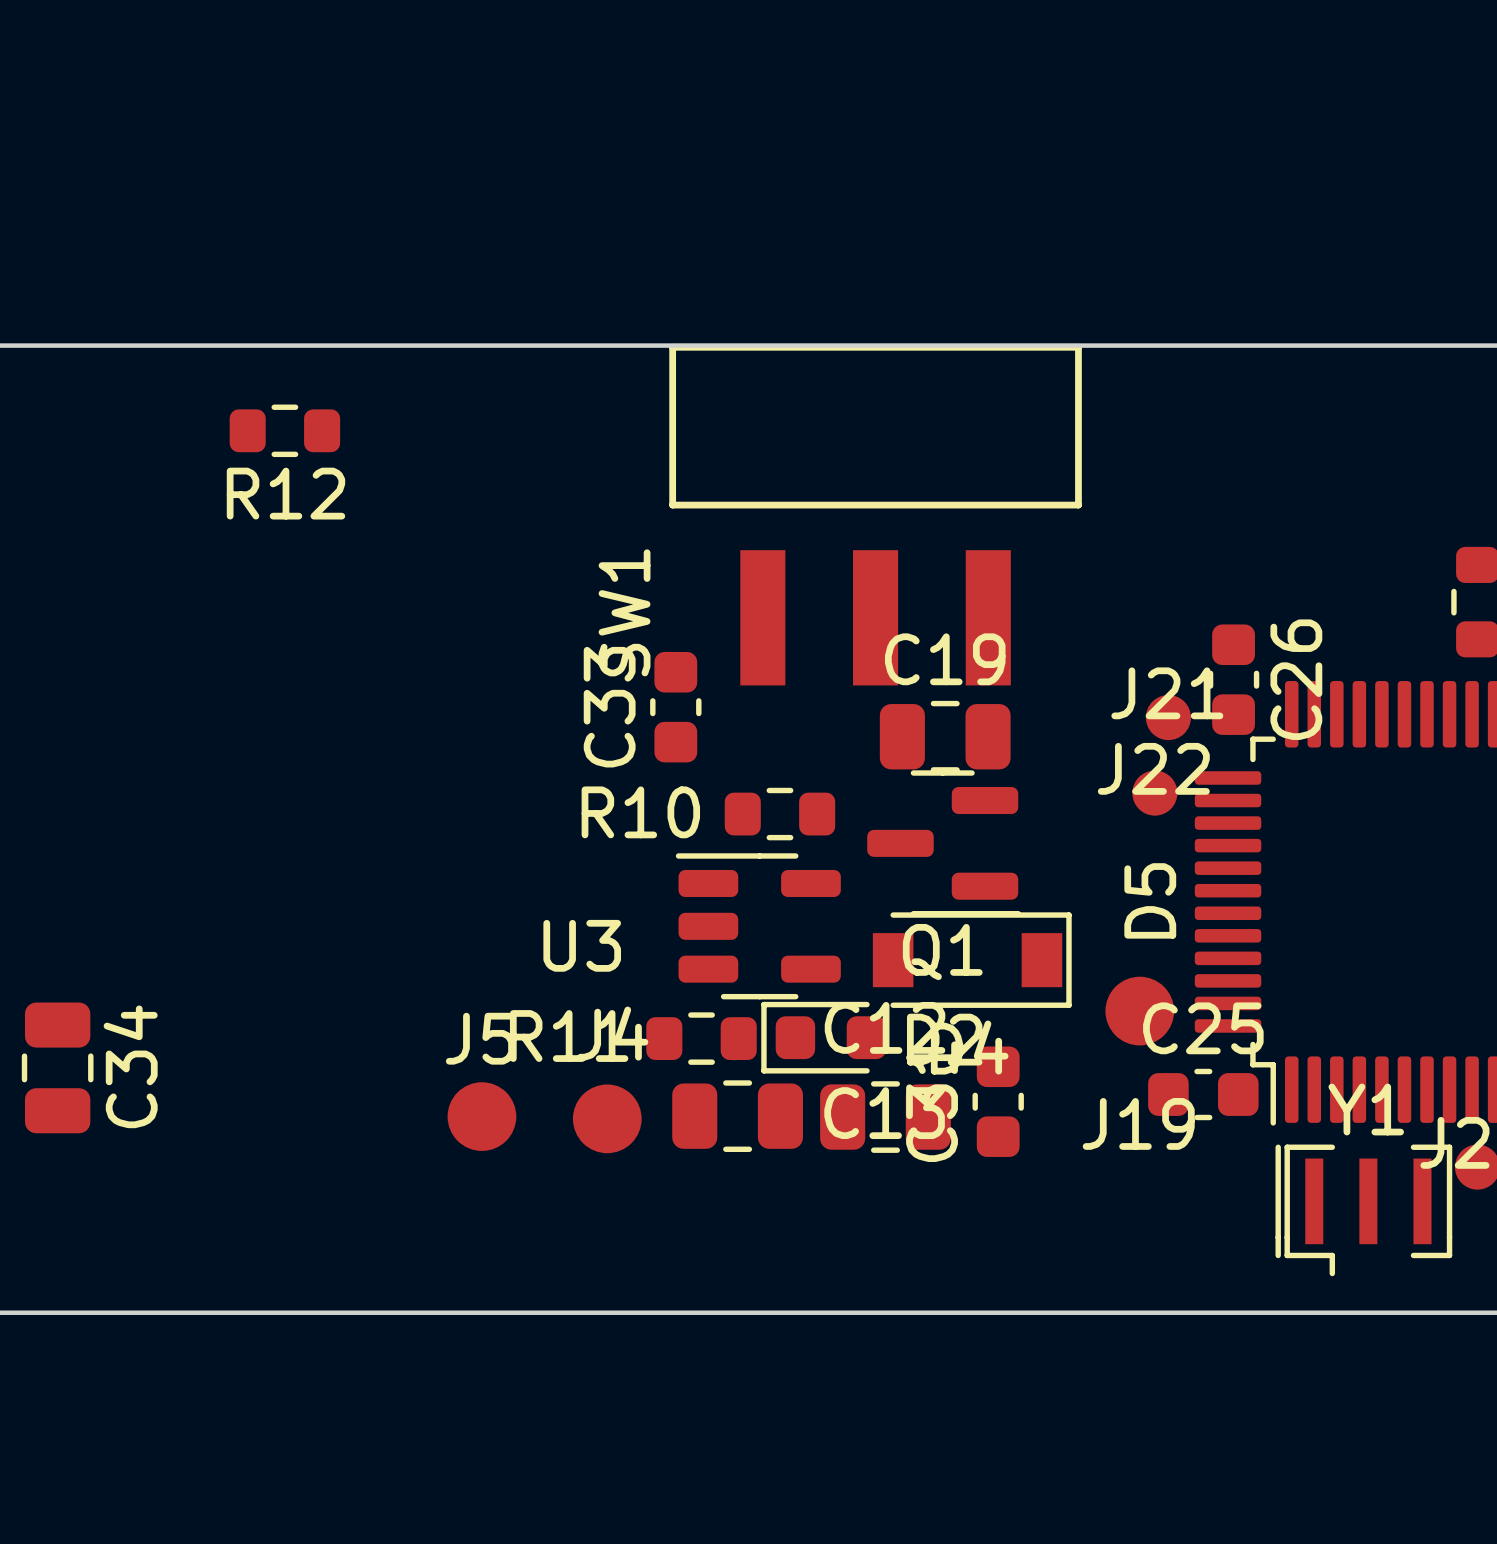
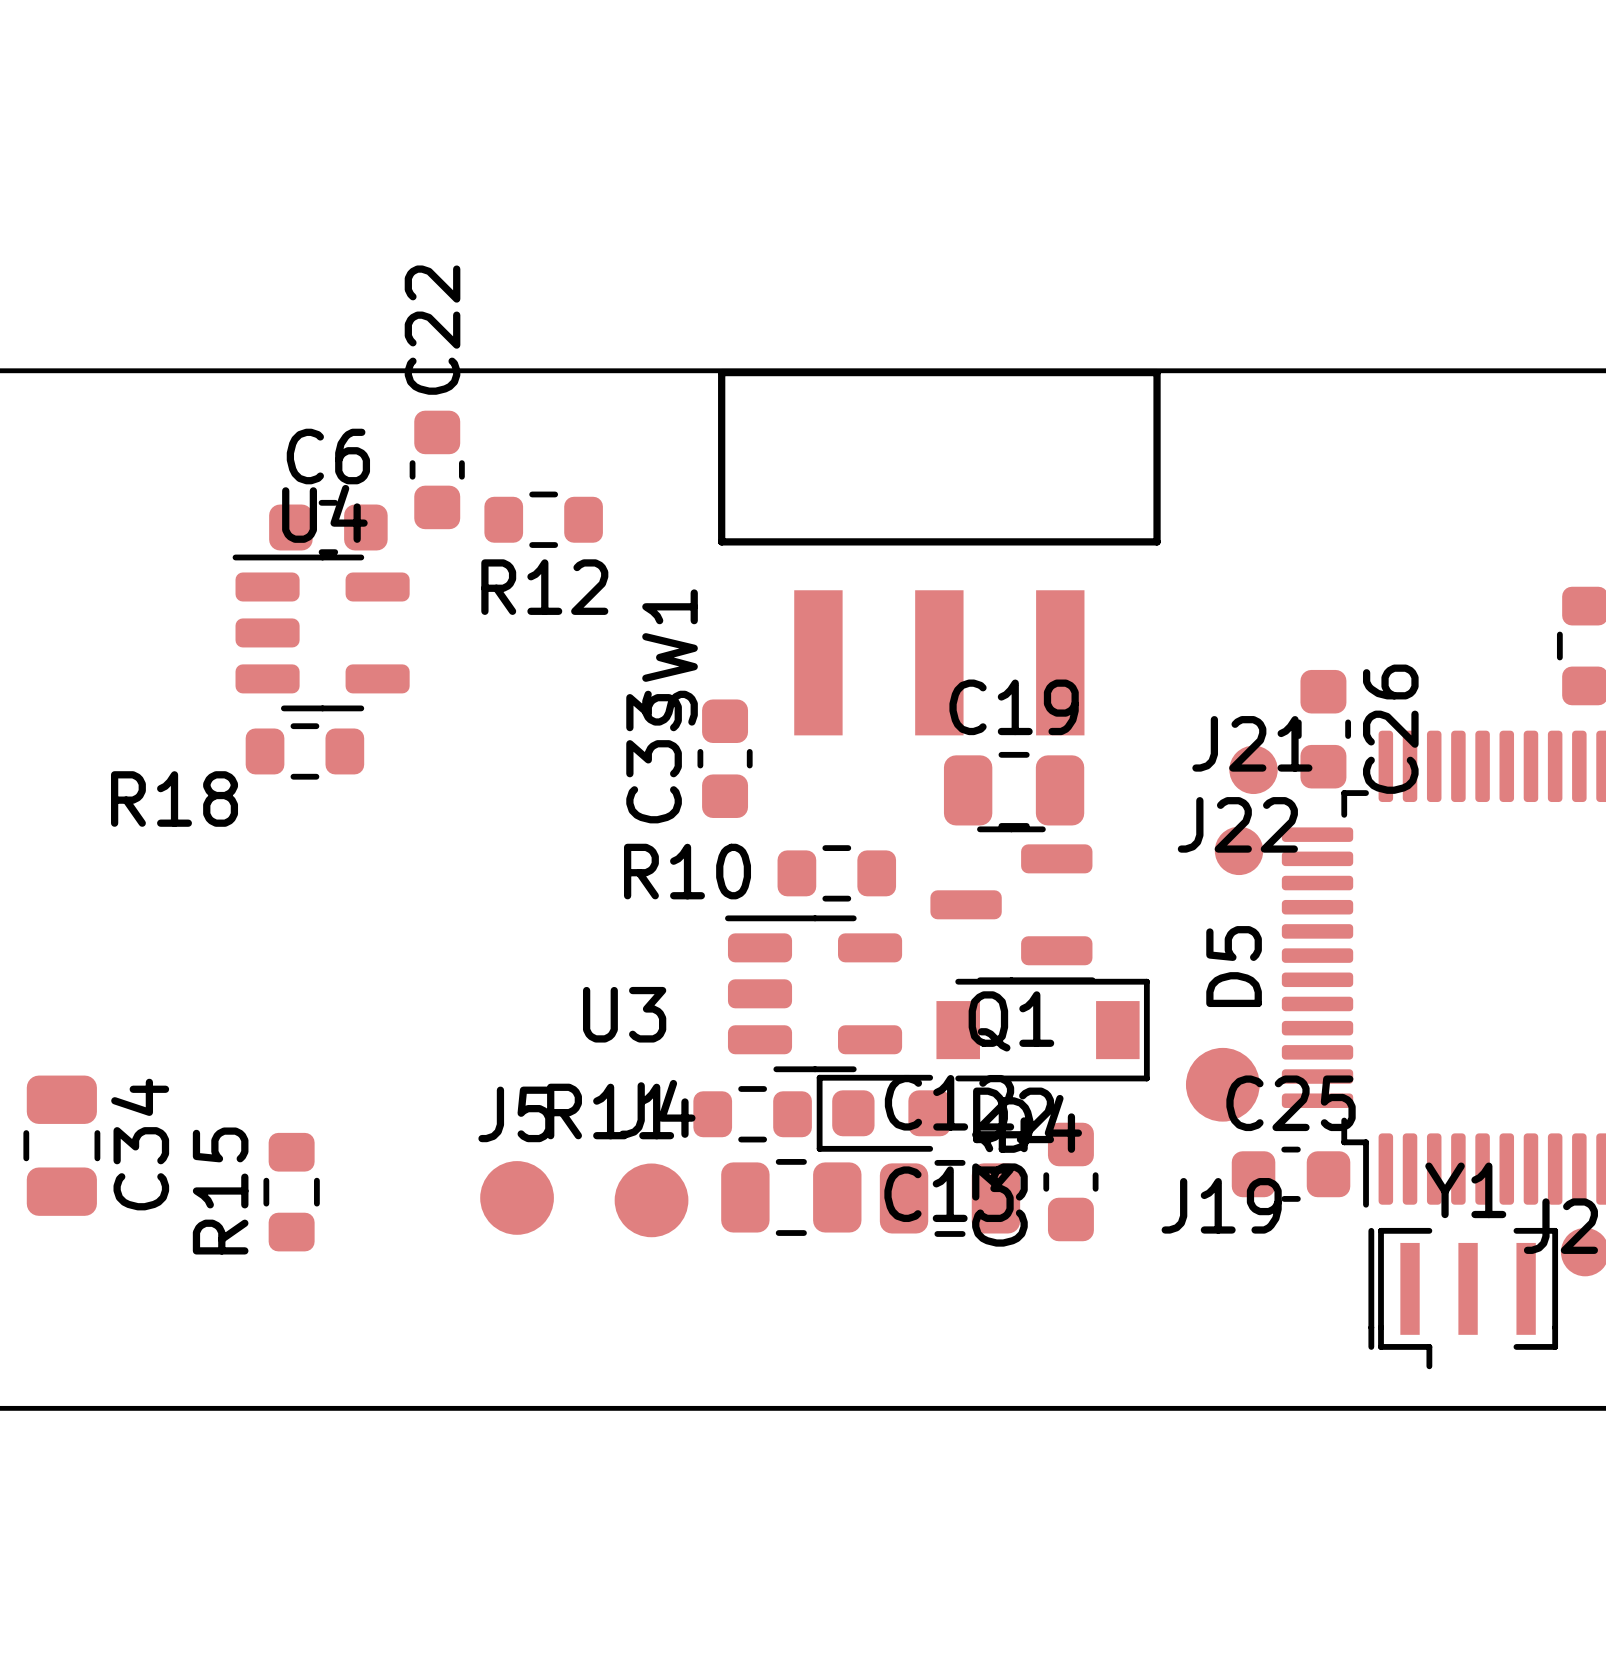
R12 position: (284, 430) -> (543, 519)
C22: none -> (437, 469)
C6: none -> (328, 527)
U4: none -> (321, 632)
R18: none -> (304, 751)
R15: none -> (291, 1192)

